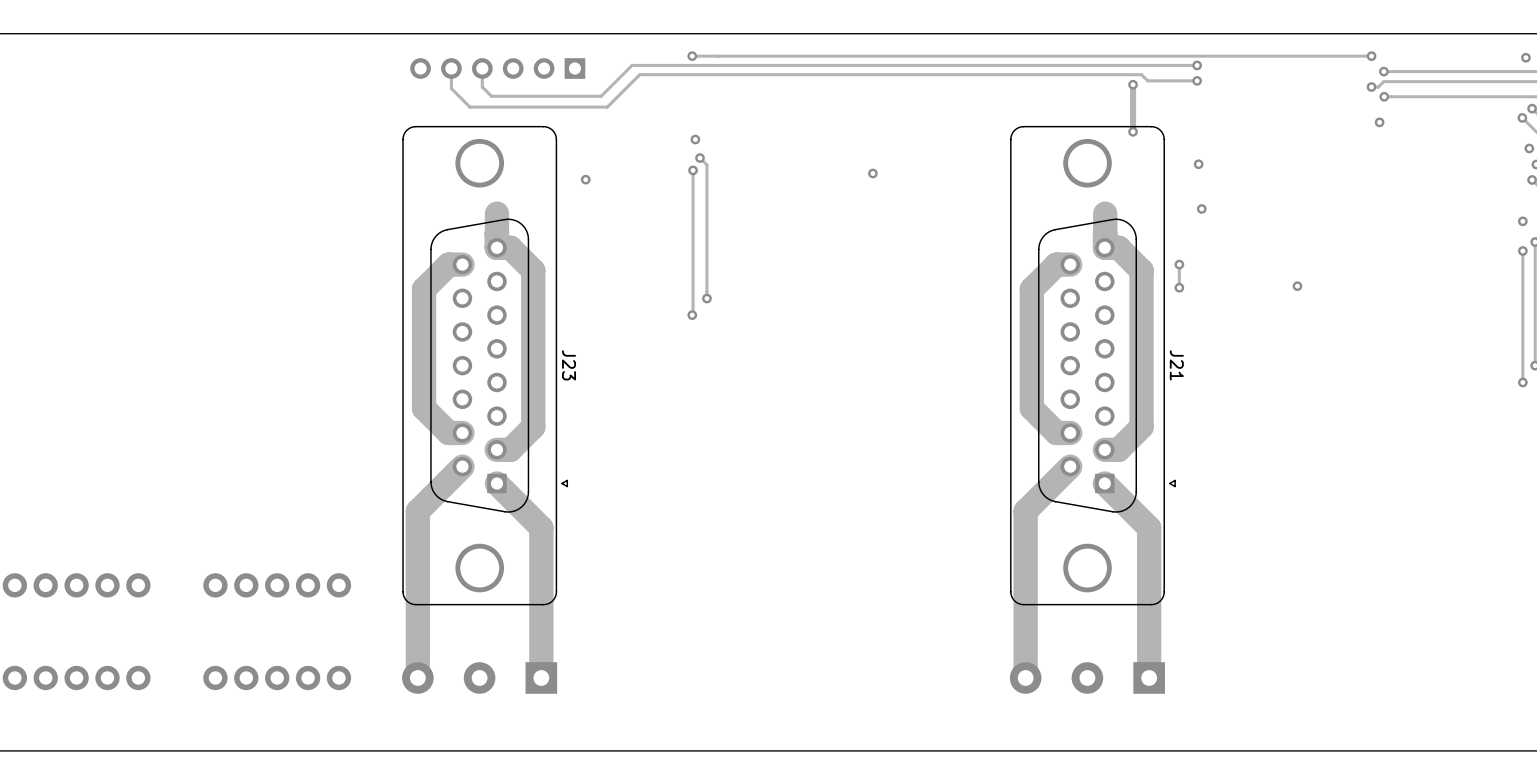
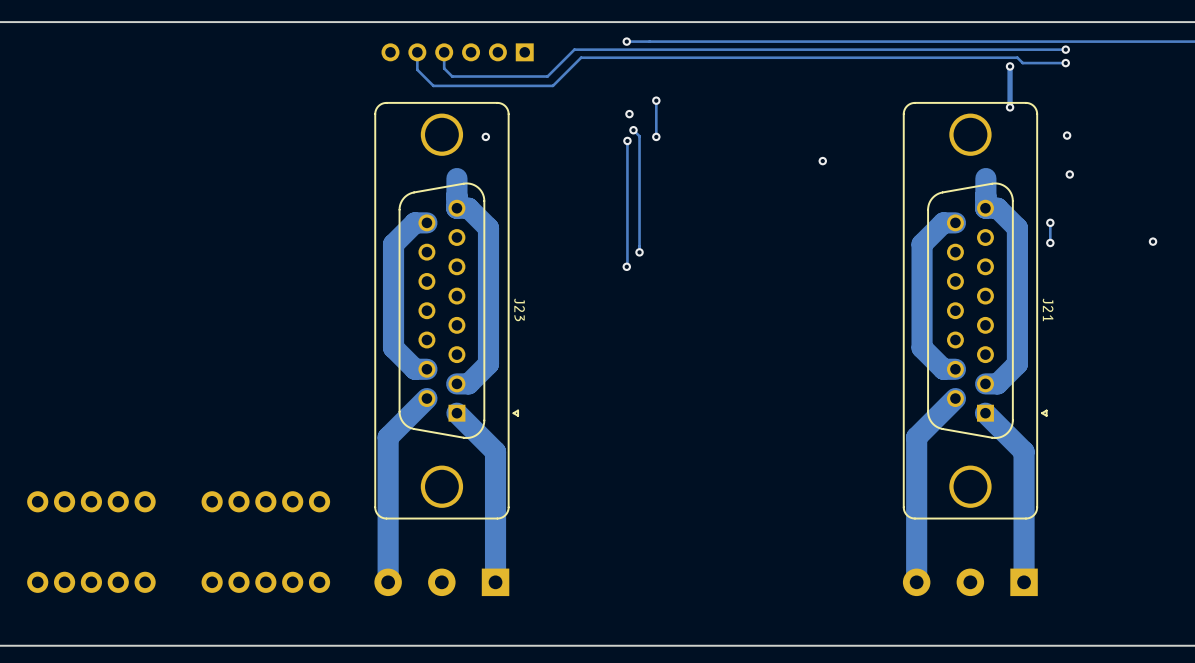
track: none -> (656, 100) (656, 136)
via: none -> (656, 100)
via: none -> (656, 136)
via position: (872, 173) -> (822, 161)
via position: (585, 179) -> (485, 136)

